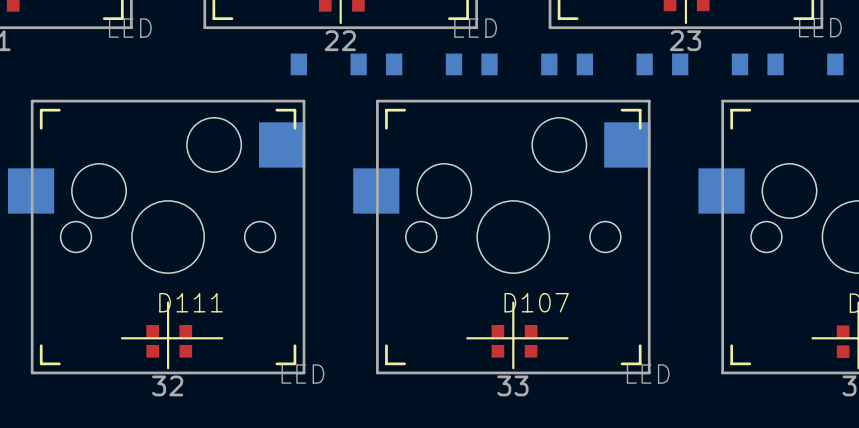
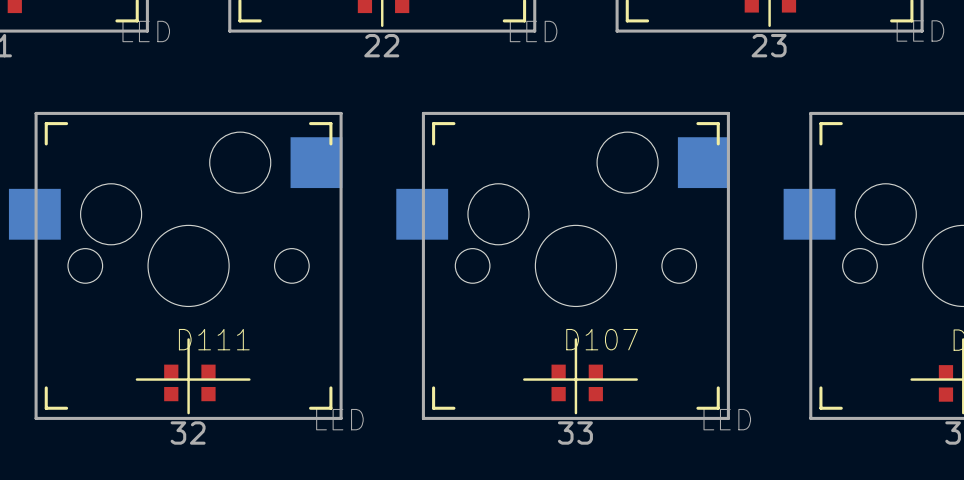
part: (328, 64) -> none
part: (424, 64) -> none
part: (519, 64) -> none
part: (614, 64) -> none
part: (710, 64) -> none
part: (805, 64) -> none

